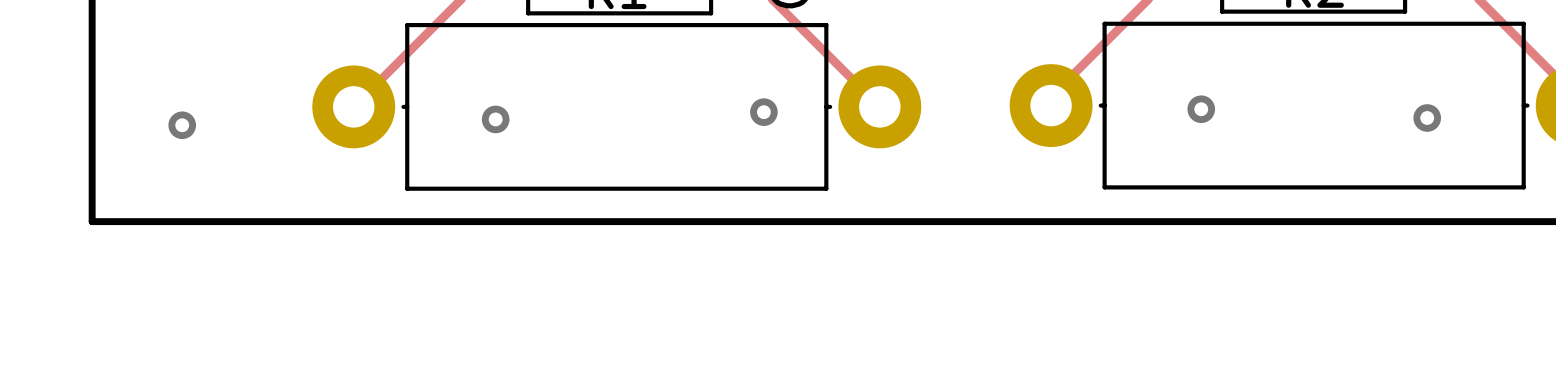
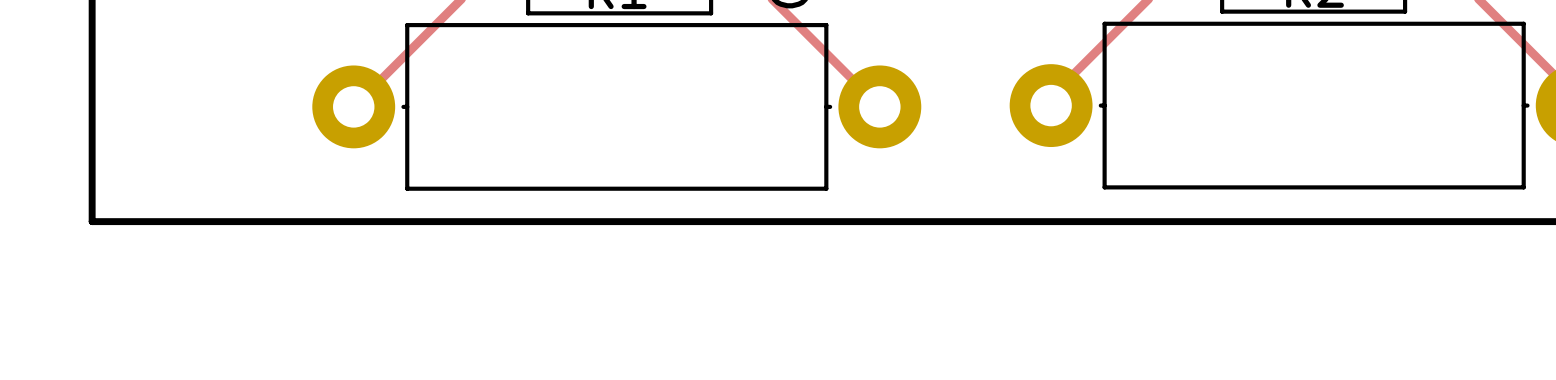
via: (1201, 109) -> none
via: (763, 112) -> none
via: (1427, 117) -> none
via: (495, 119) -> none
via: (182, 125) -> none

